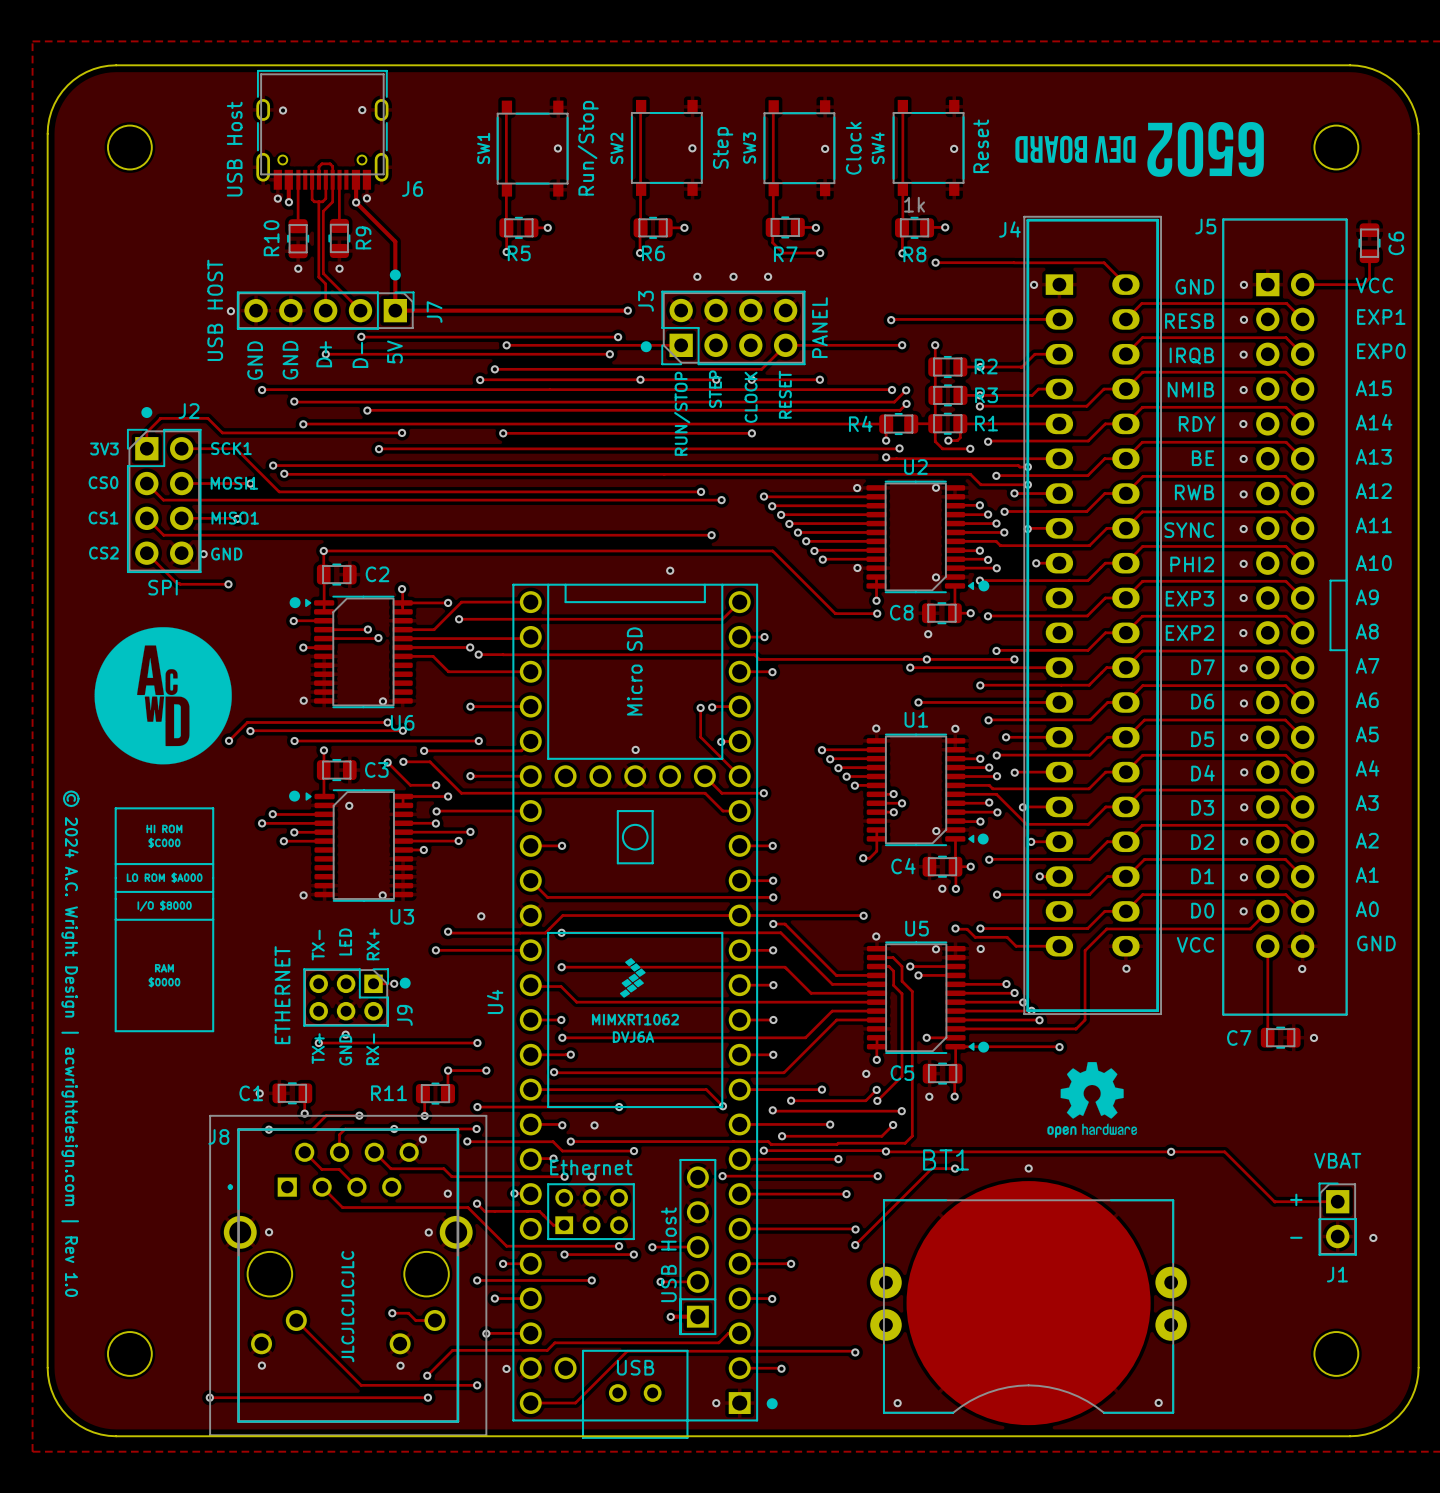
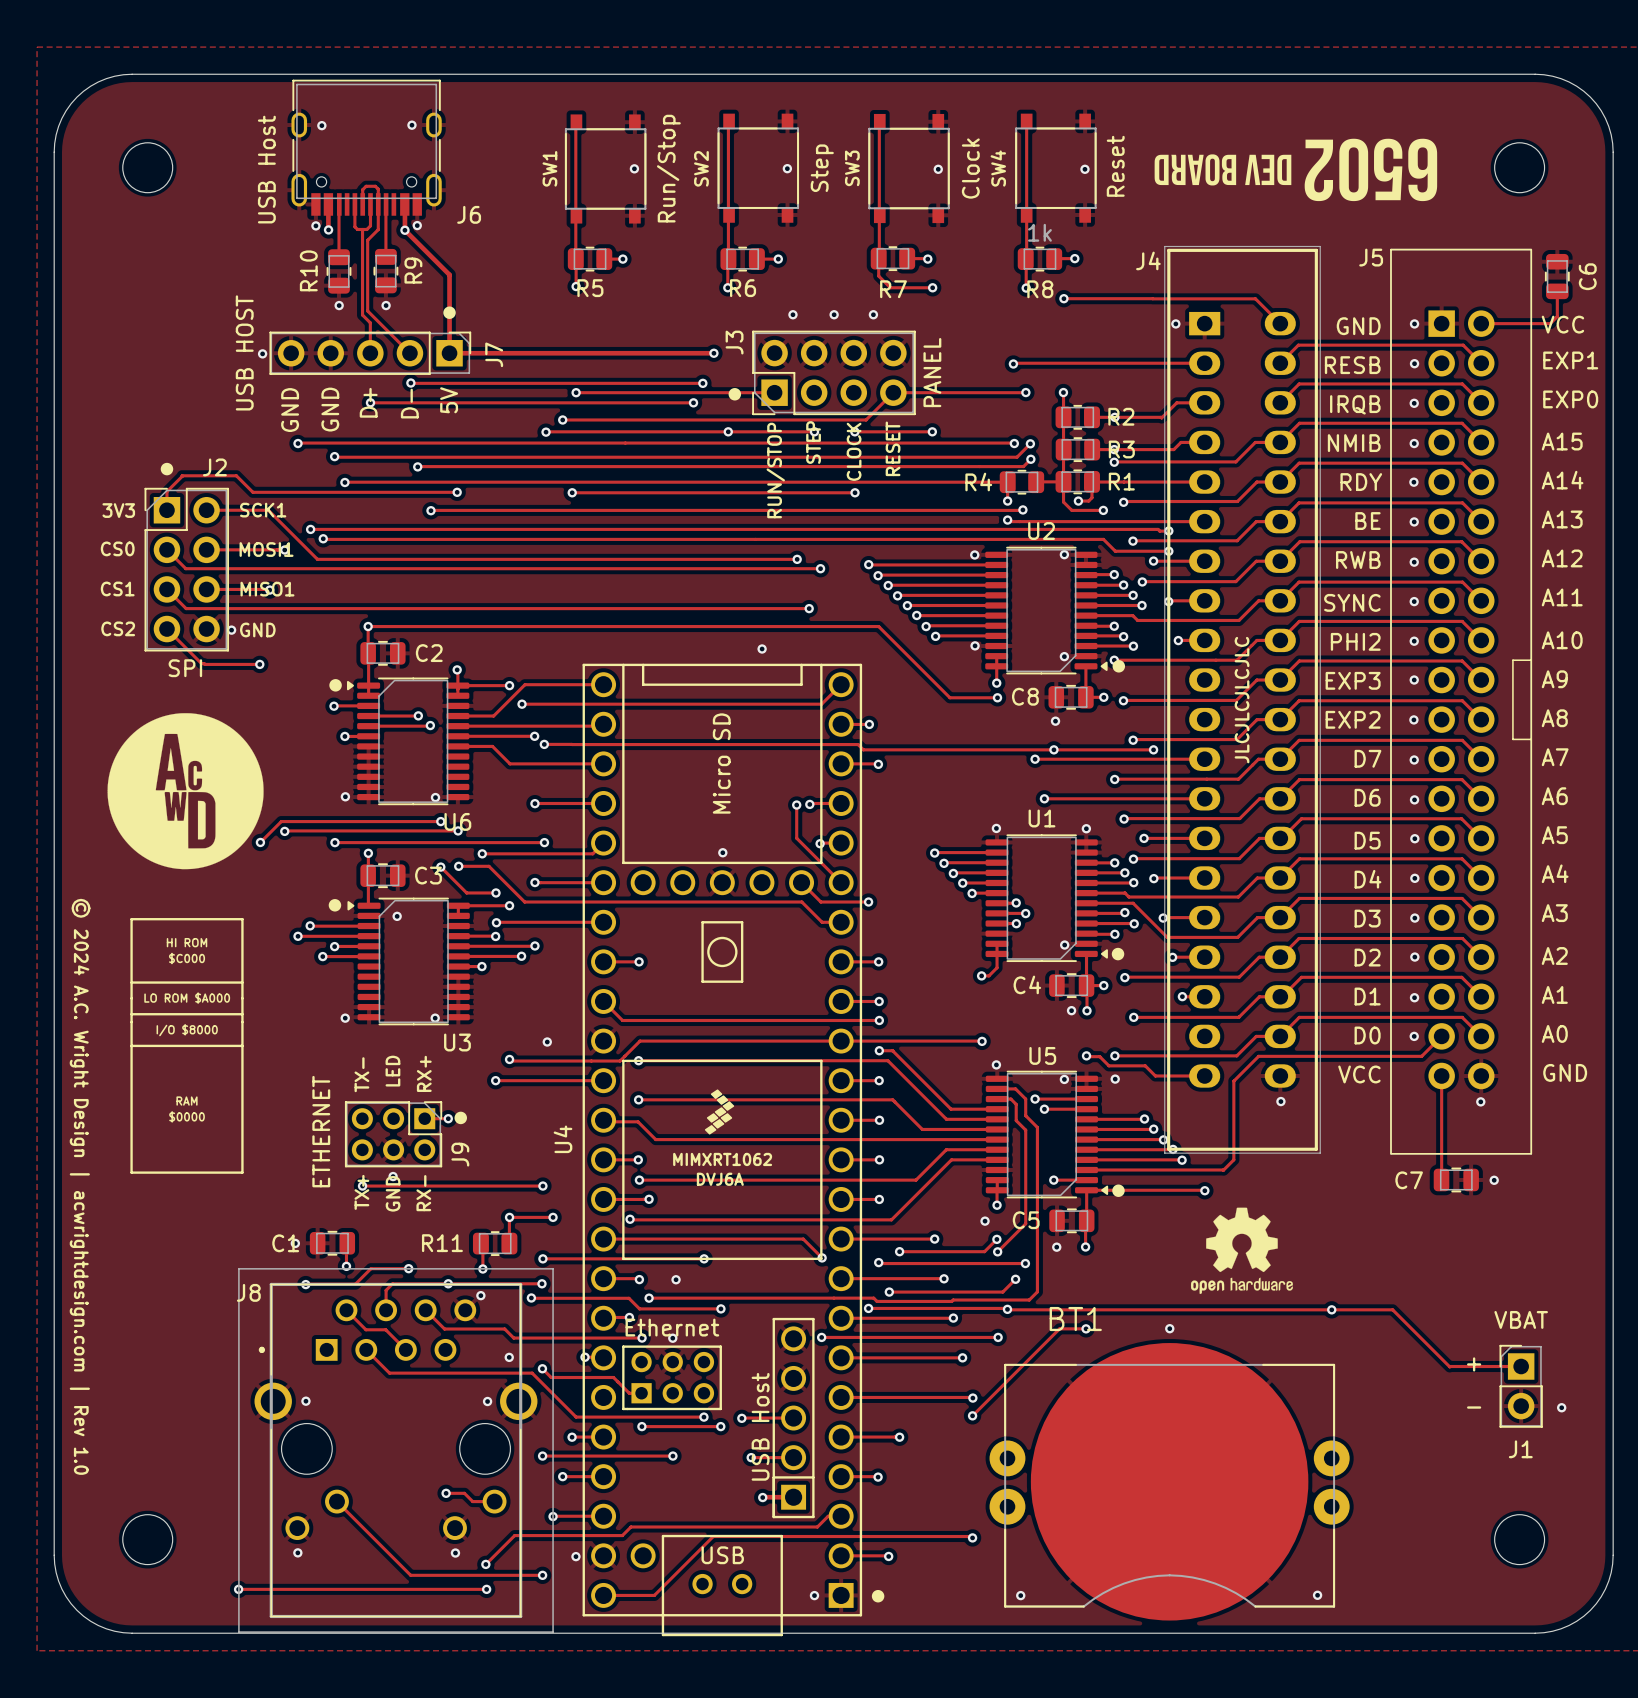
text: none -> JLCJLCJLCJLC (1242, 700)
text: JLCJLCJLCJLC (347, 1306) -> none

